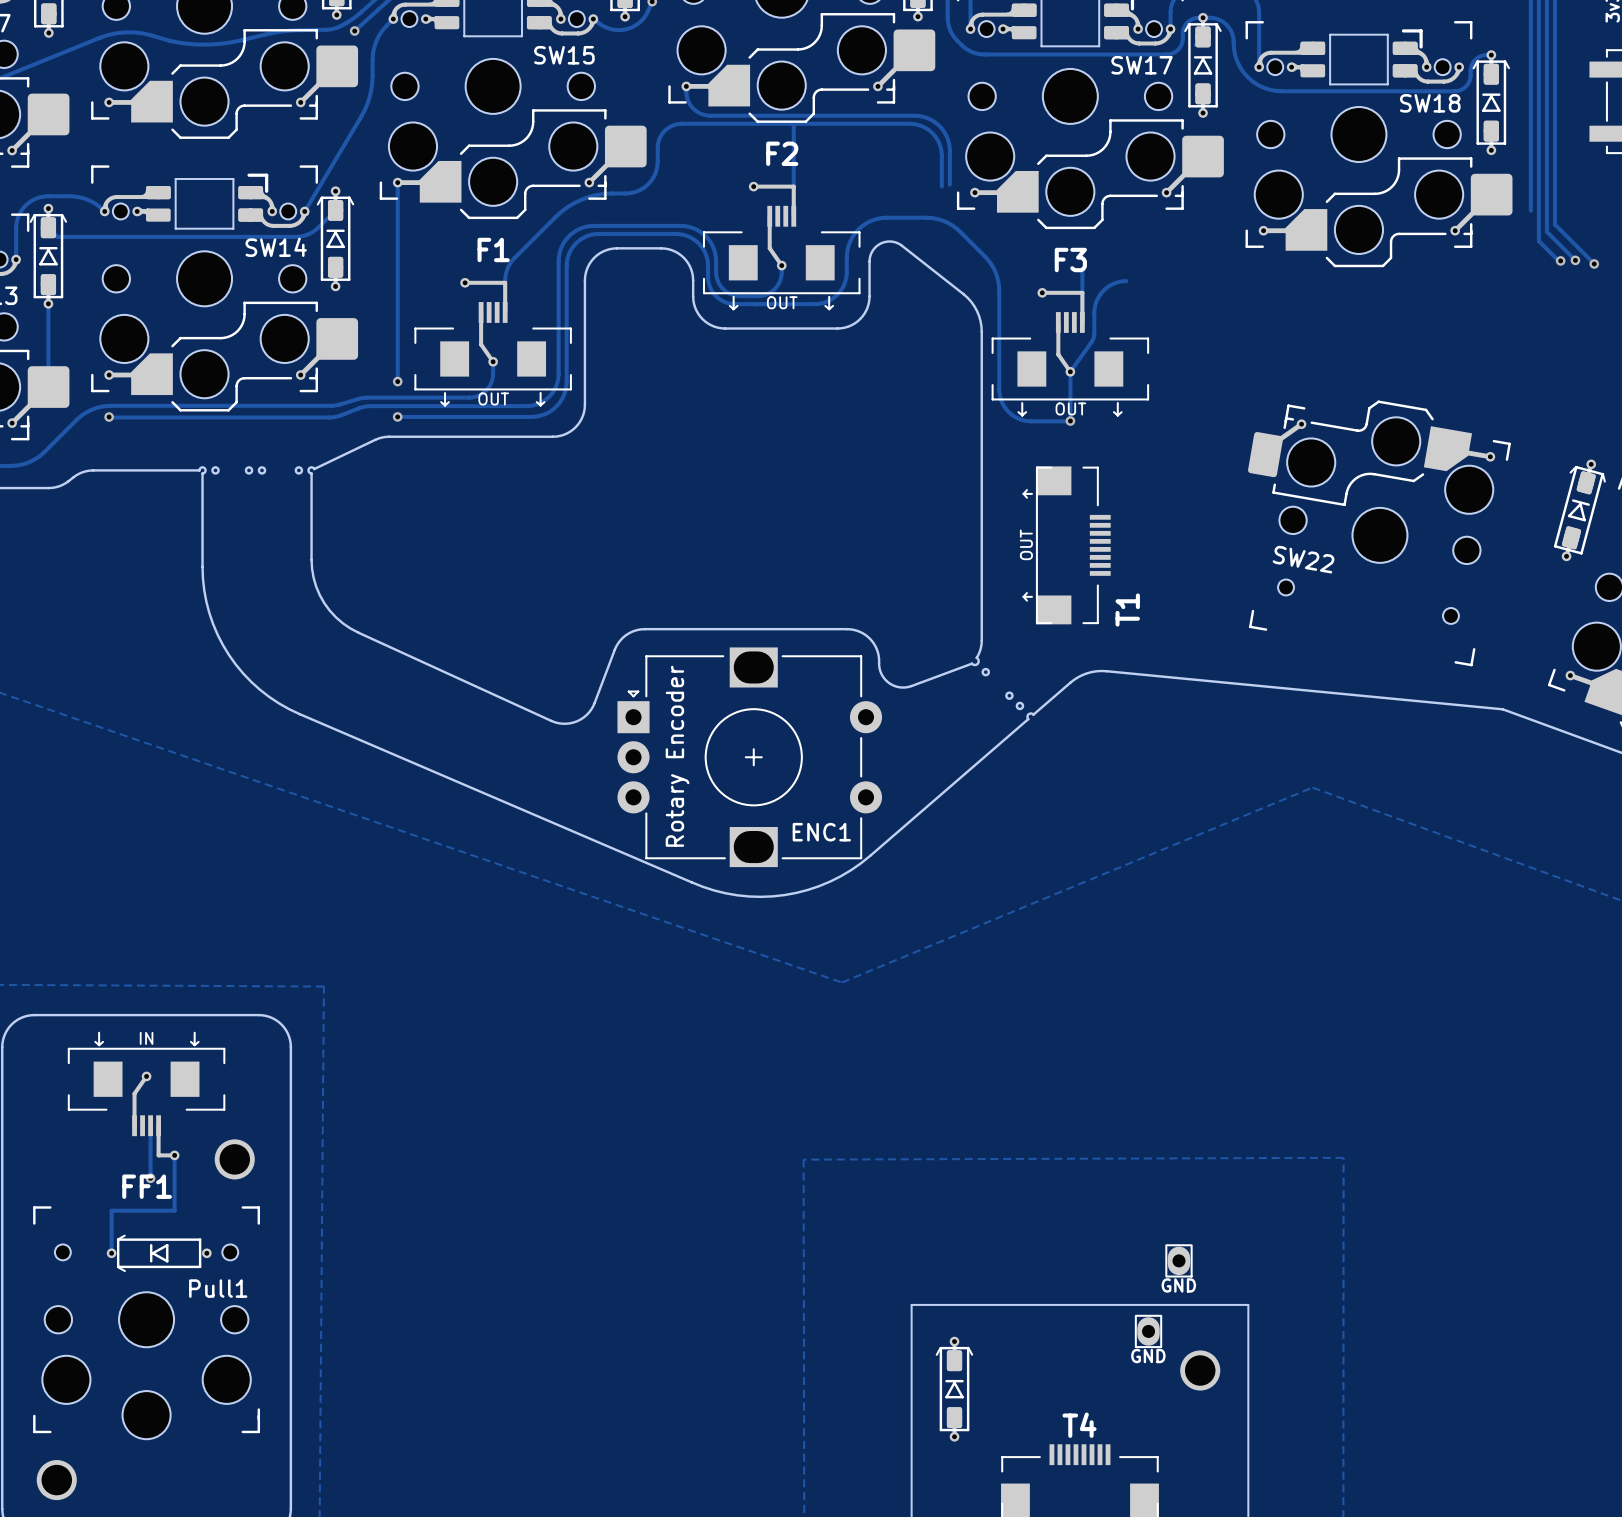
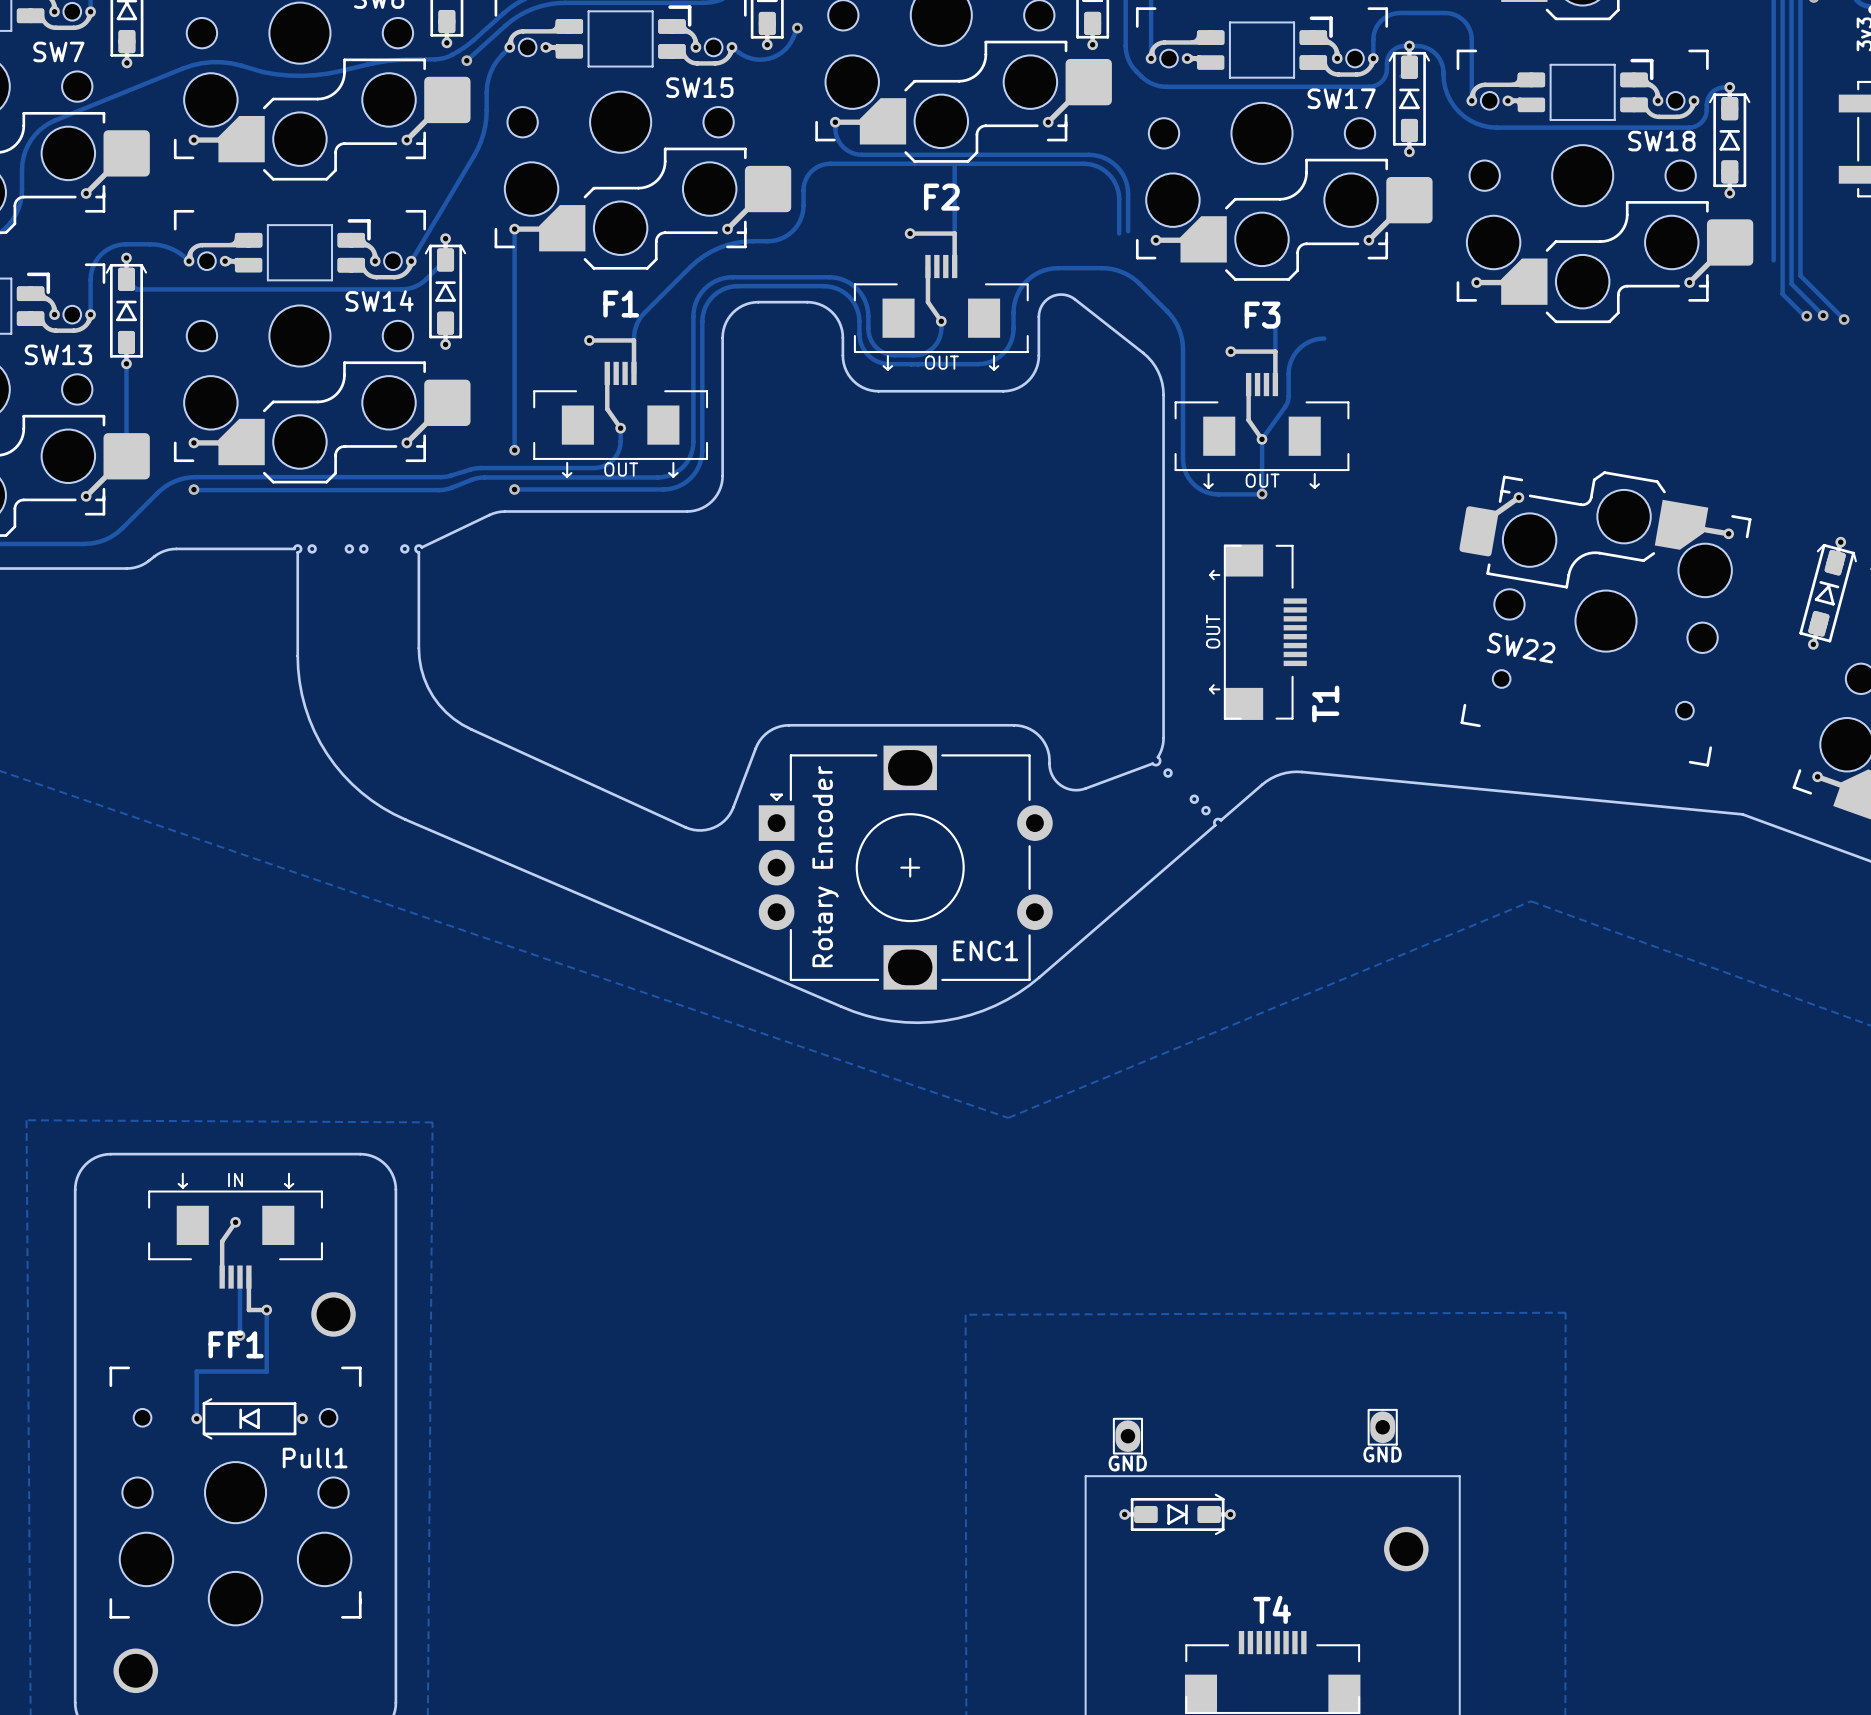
part position: (1148, 1331) -> (1127, 1436)
part rotation: 0° (954, 1389) -> 90° clockwise (1177, 1514)
part position: (954, 1389) -> (1177, 1514)

